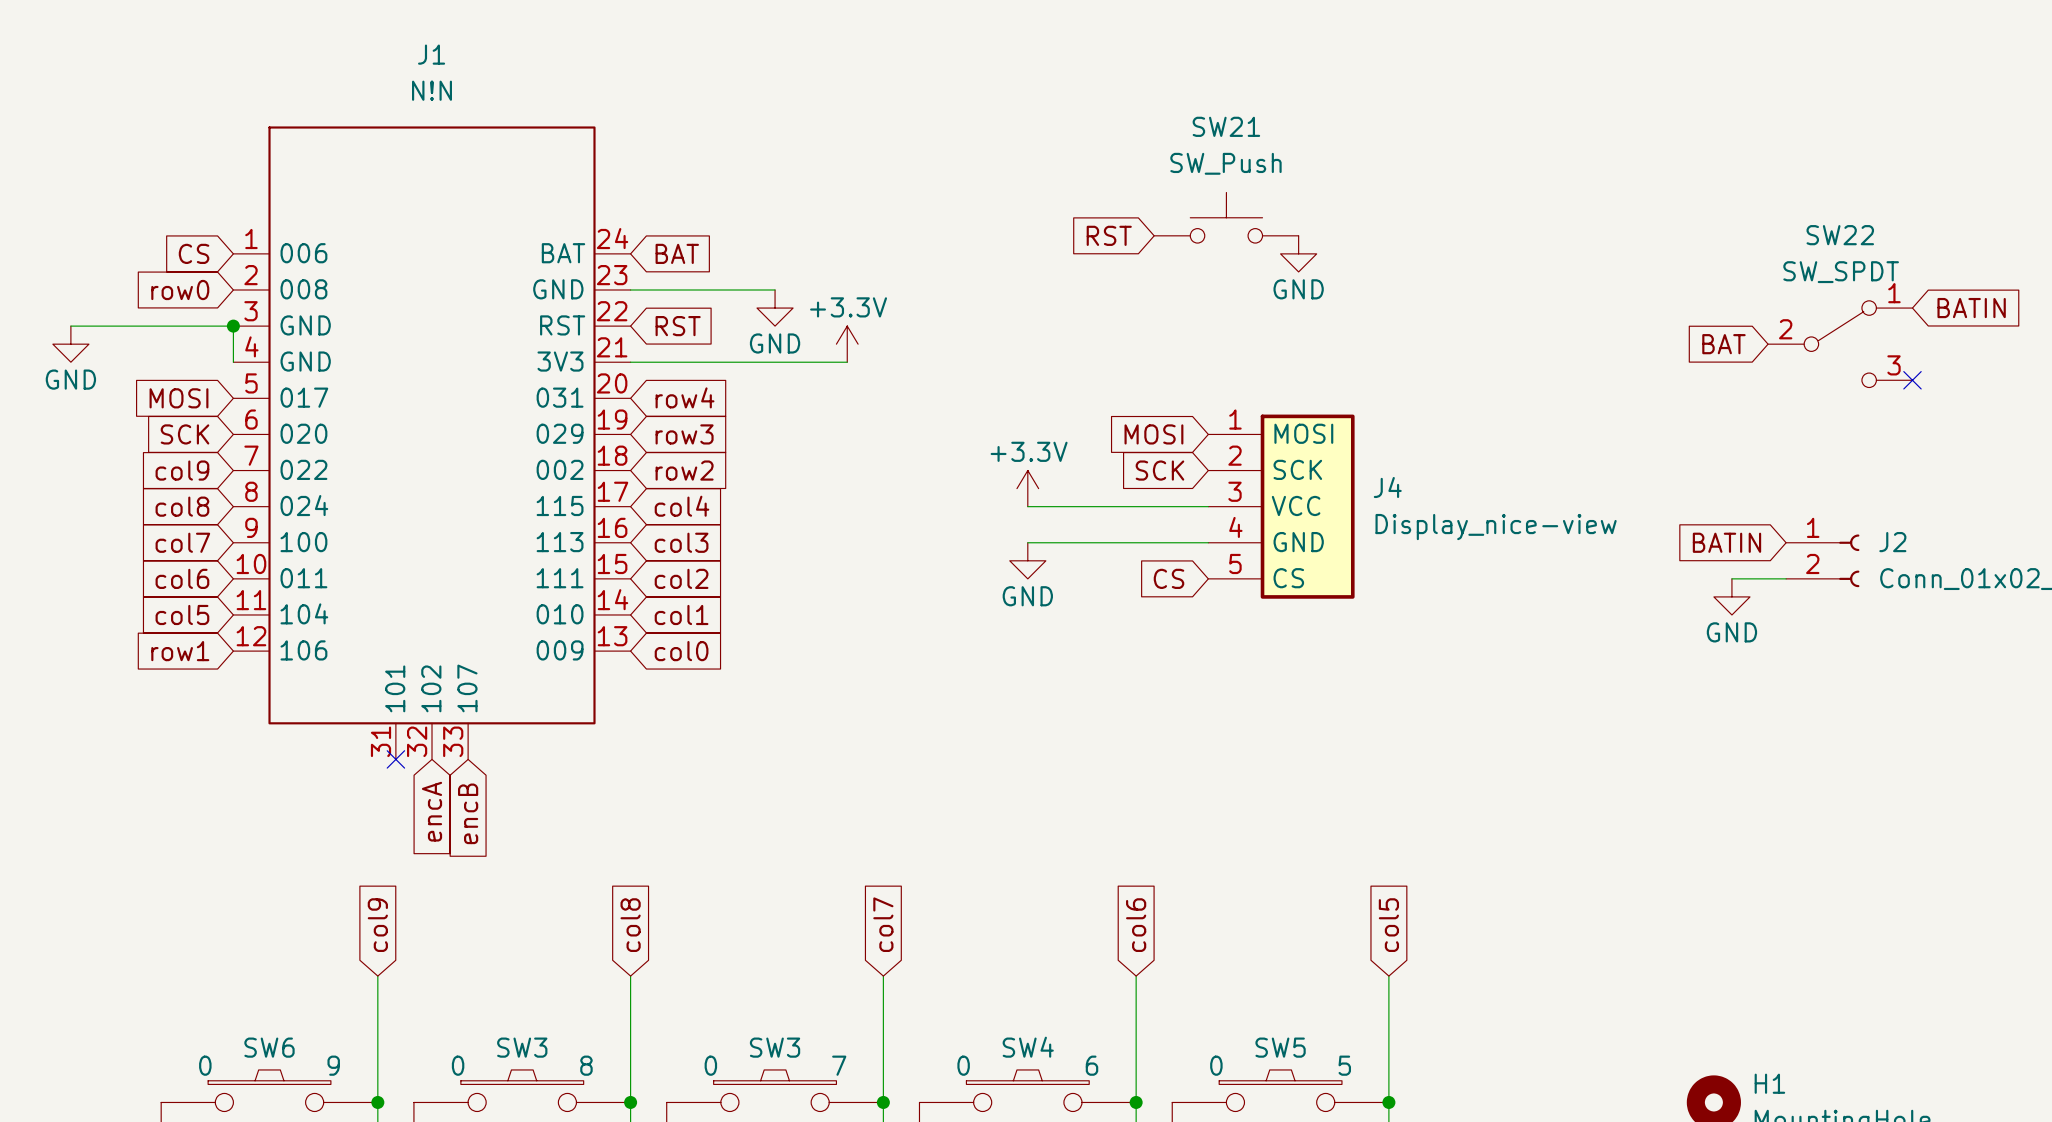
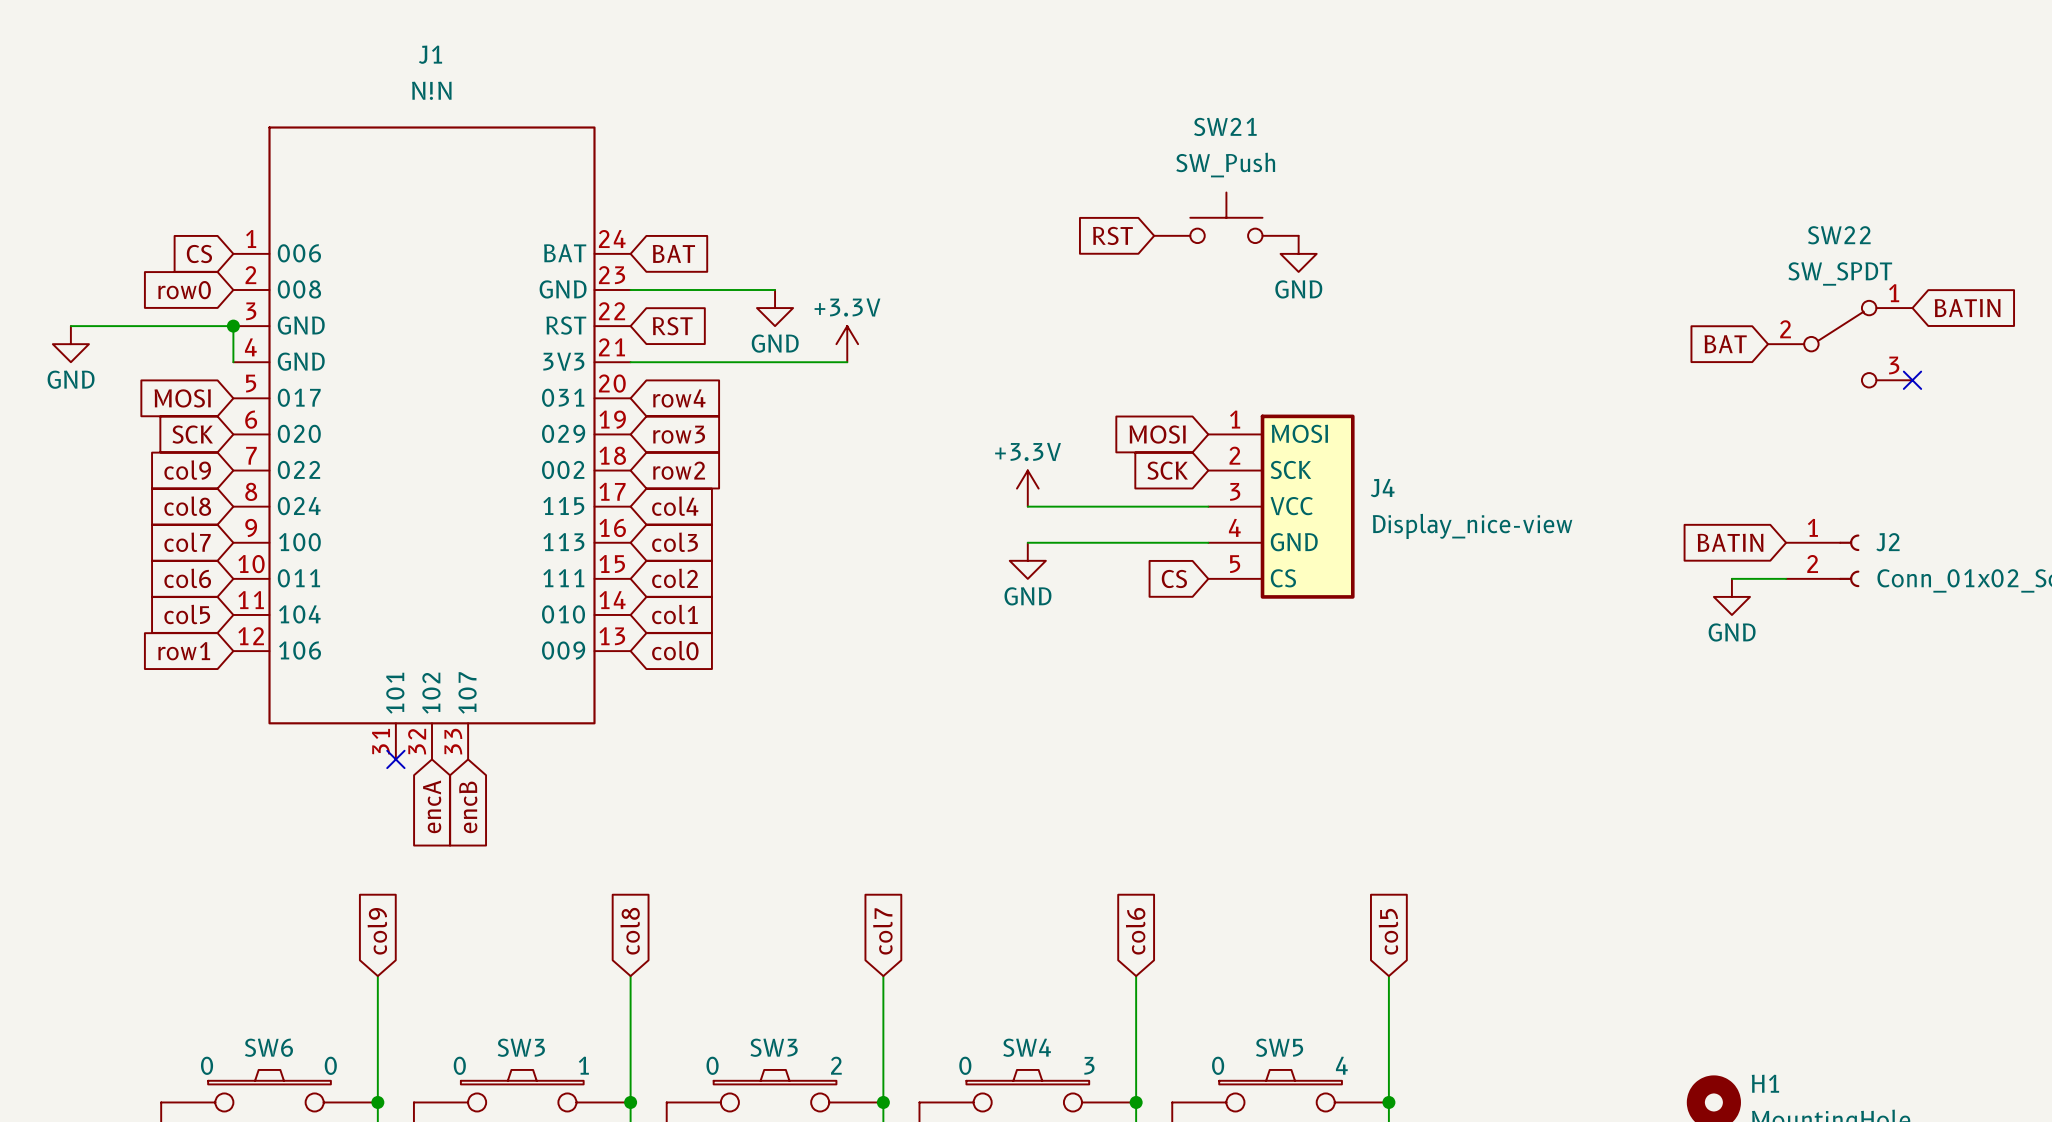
SW6 text: 9 (333, 1065) -> 0 (330, 1065)
SW3 text: 8 (586, 1065) -> 1 (583, 1065)
SW3 text: 7 (839, 1065) -> 2 (836, 1065)
SW4 text: 6 (1091, 1065) -> 3 (1089, 1065)
SW5 text: 5 (1344, 1065) -> 4 (1341, 1065)

